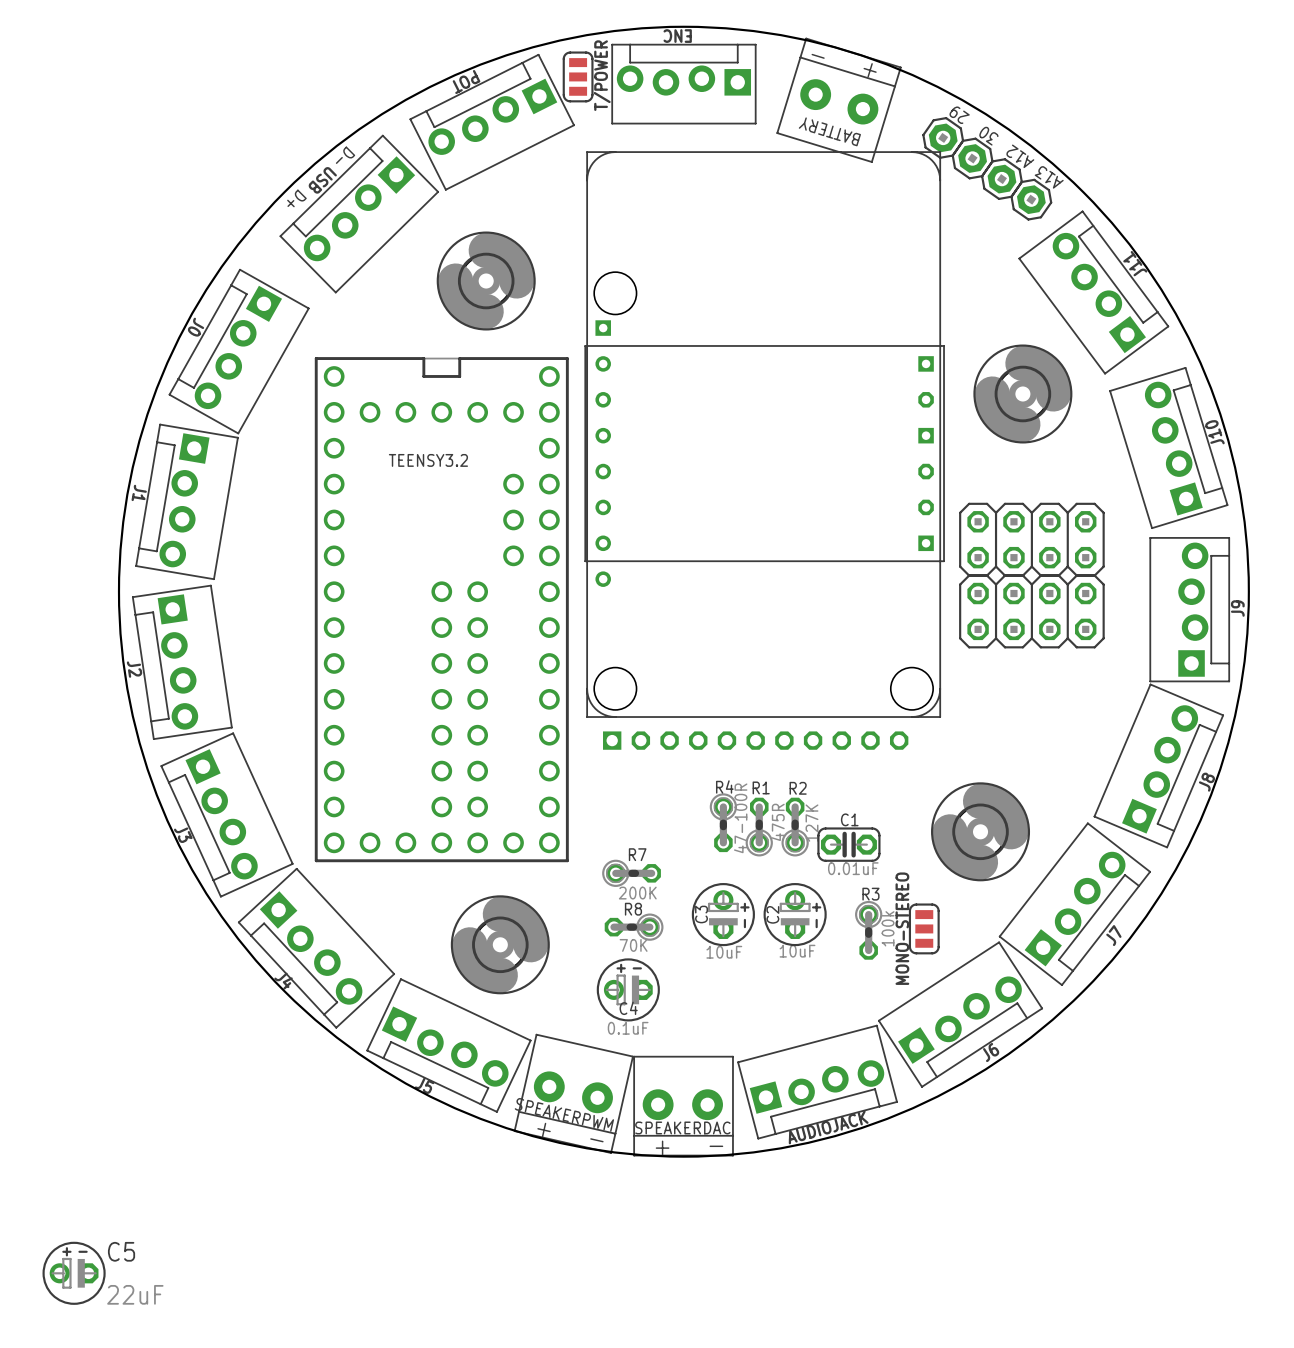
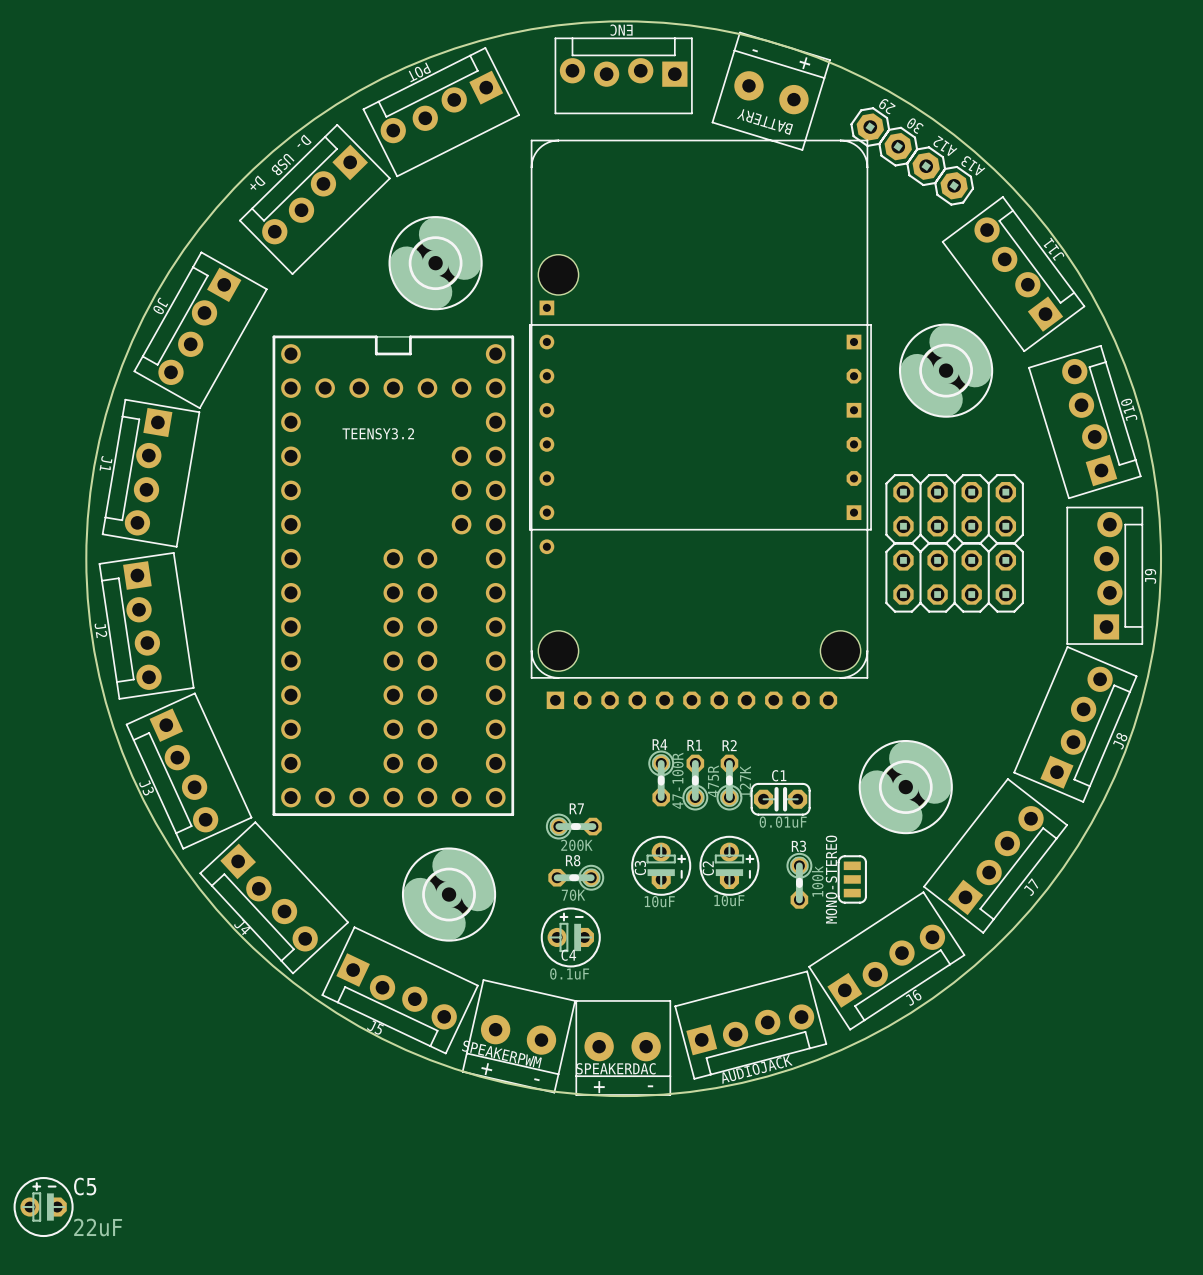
T/POWER: (578, 76) -> none

